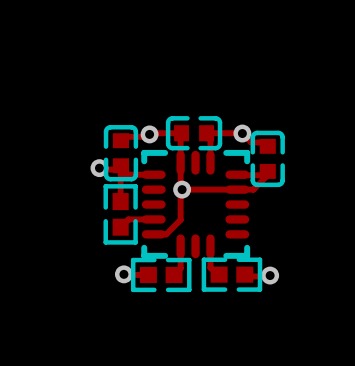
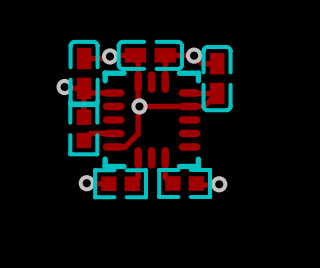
part footprint: [165, 116, 223, 151] -> [116, 39, 184, 71]
part footprint: [103, 125, 139, 182] -> [68, 39, 100, 108]
part footprint: [250, 130, 285, 188] -> [201, 44, 233, 113]

